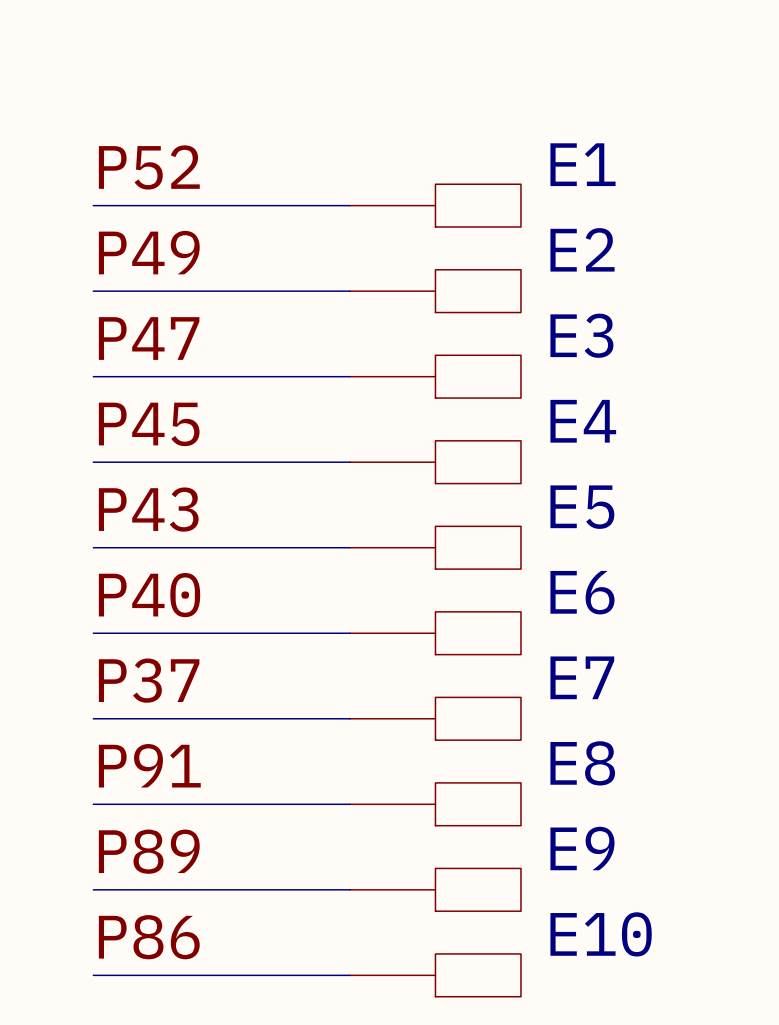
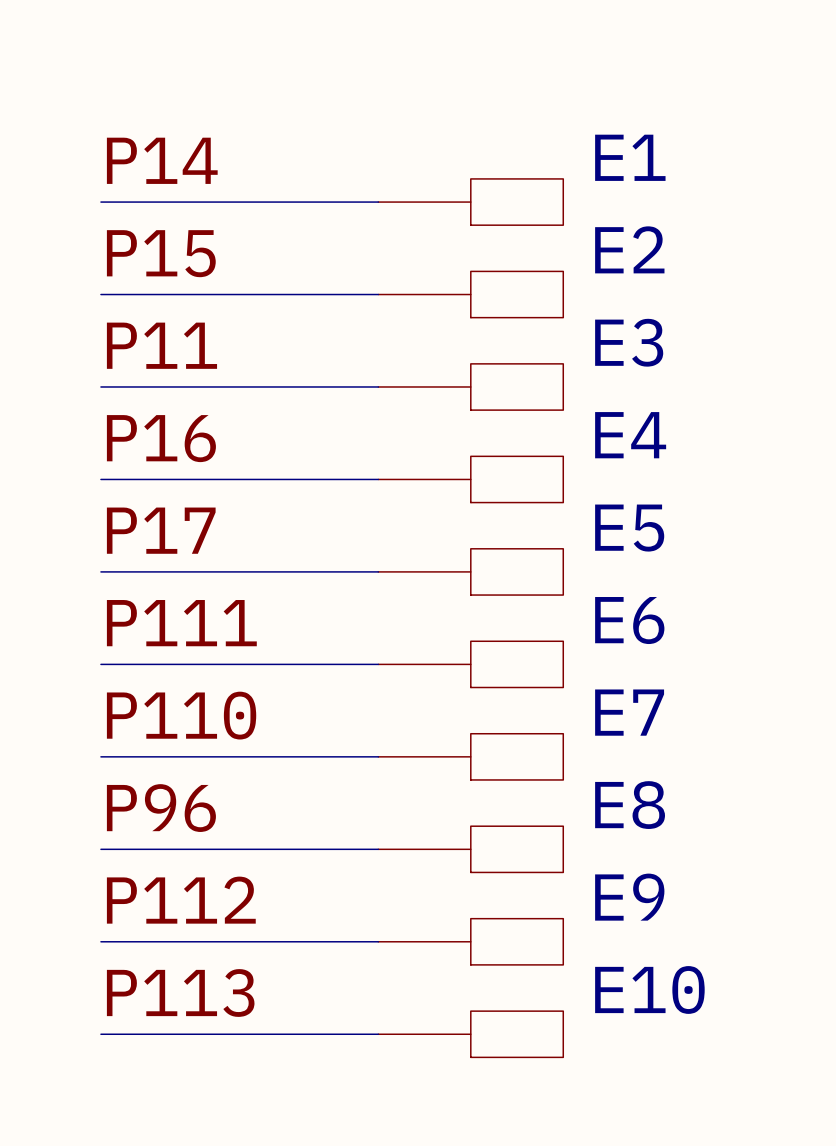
label: P52 (149, 167) -> P14 (162, 160)
label: P49 (149, 252) -> P15 (161, 253)
label: P47 (149, 338) -> P11 (161, 345)
label: P45 (149, 424) -> P16 (161, 438)
label: P43 (148, 509) -> P17 (161, 530)
label: P40 (149, 595) -> P111 (181, 623)
label: P37 (149, 680) -> P110 (181, 715)
label: P91 (149, 765) -> P96 (161, 808)
label: P89 (149, 851) -> P112 (181, 900)
label: P86 (149, 937) -> P113 (180, 992)

